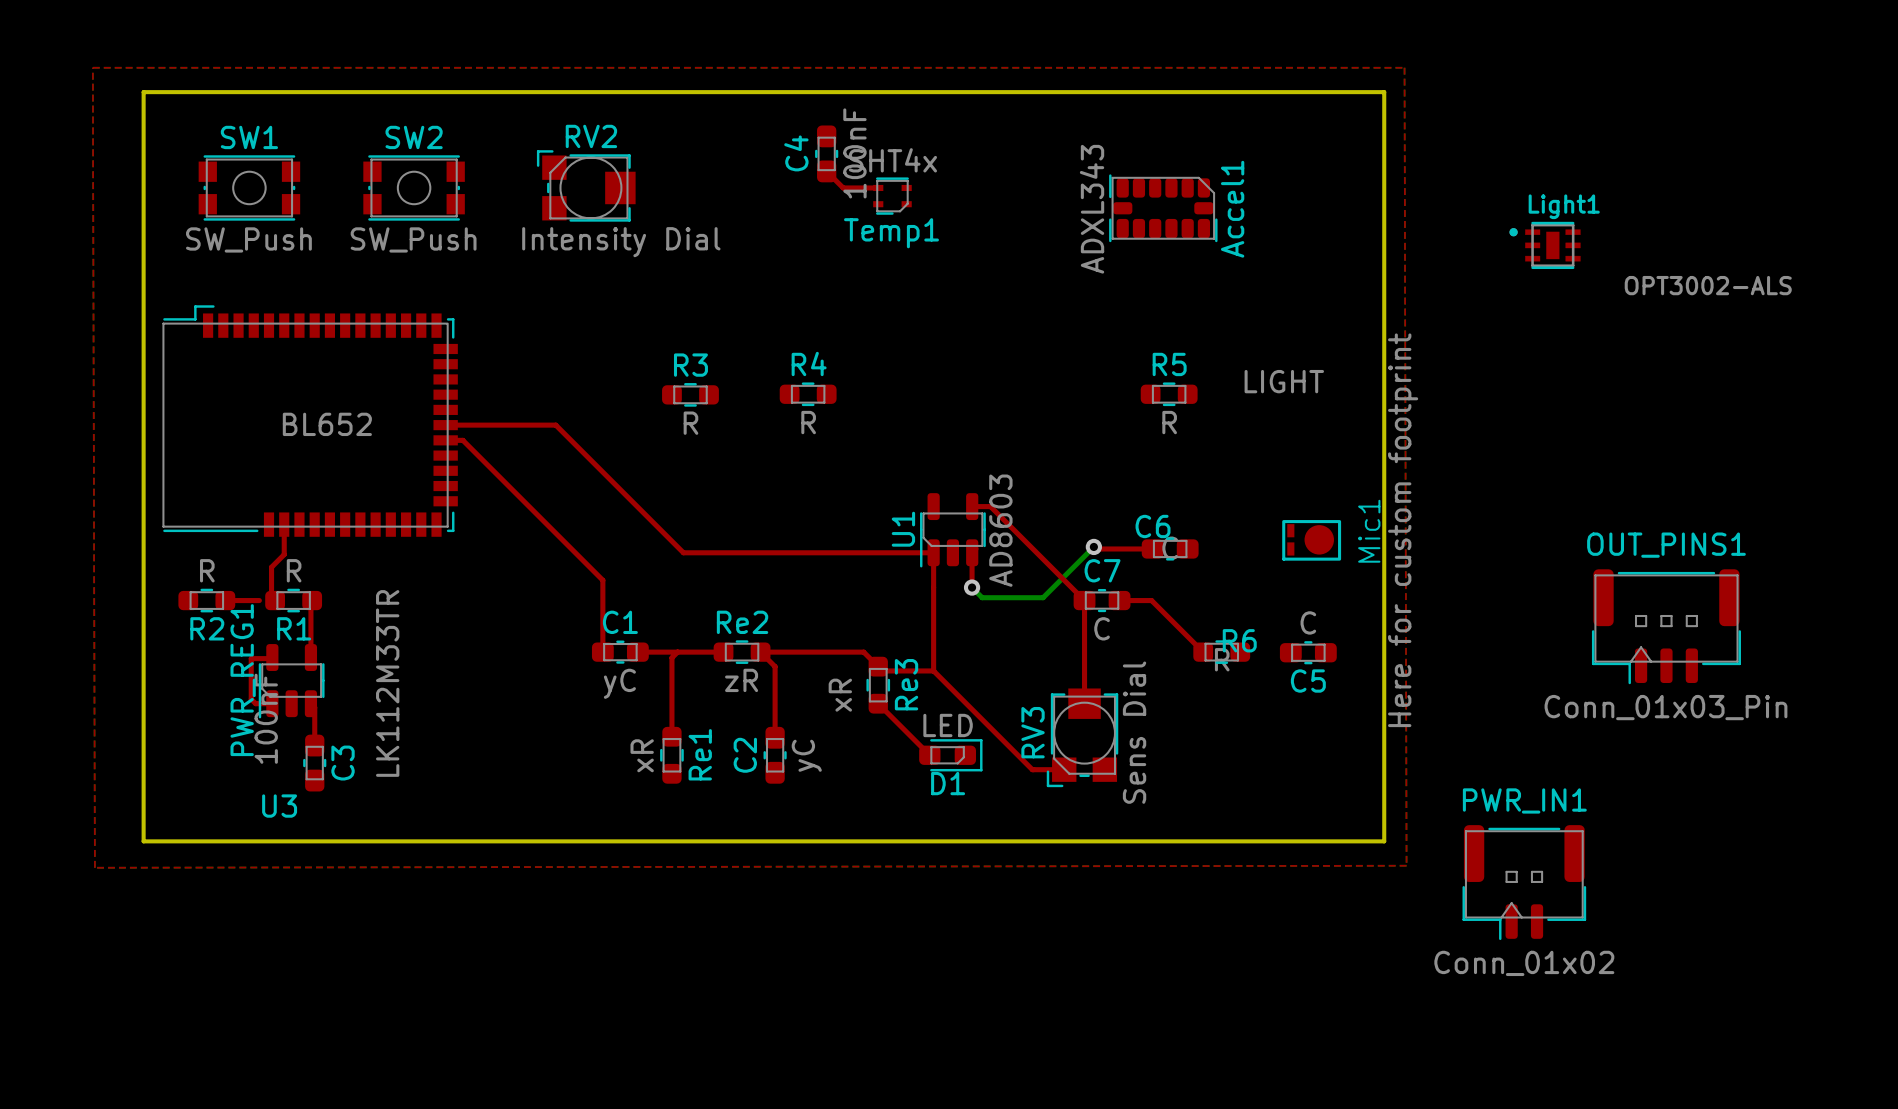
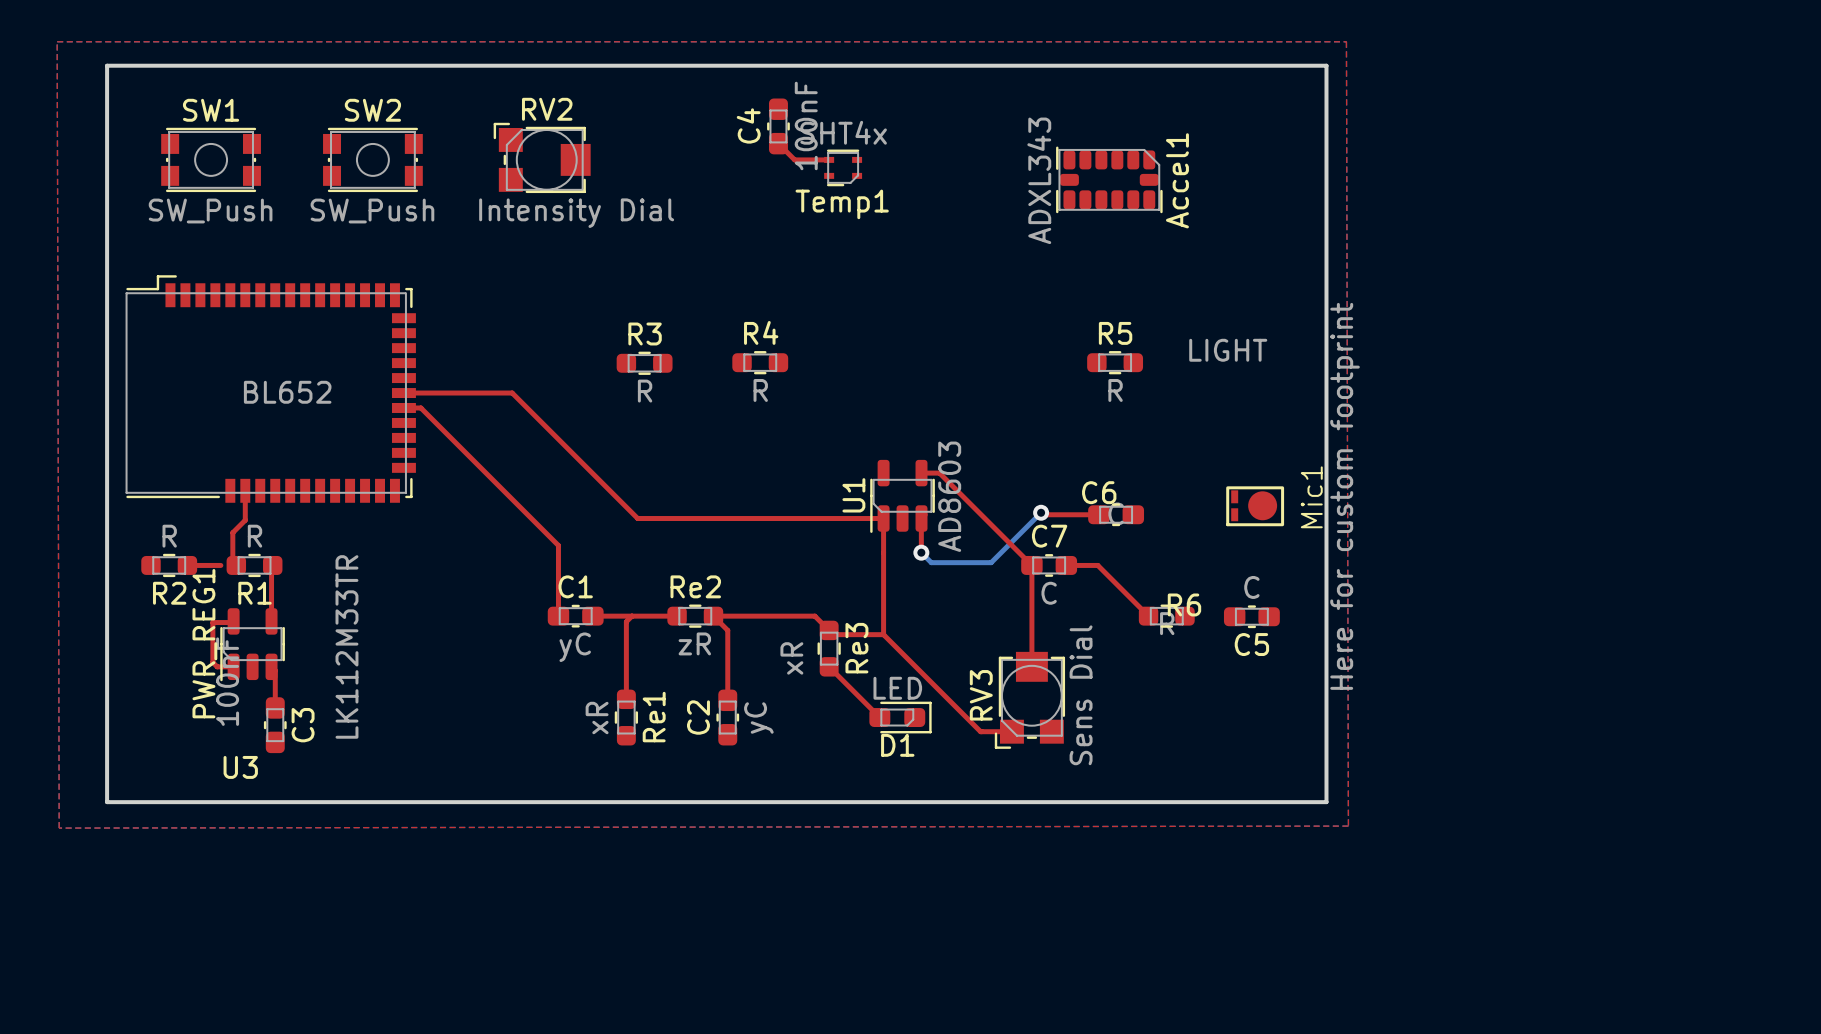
Light1: OPT3002-ALS (1545, 245) -> none
OUT_PINS1: Conn_01x03_Pin (1666, 626) -> none
PWR_IN1: Conn_01x02 (1524, 882) -> none

